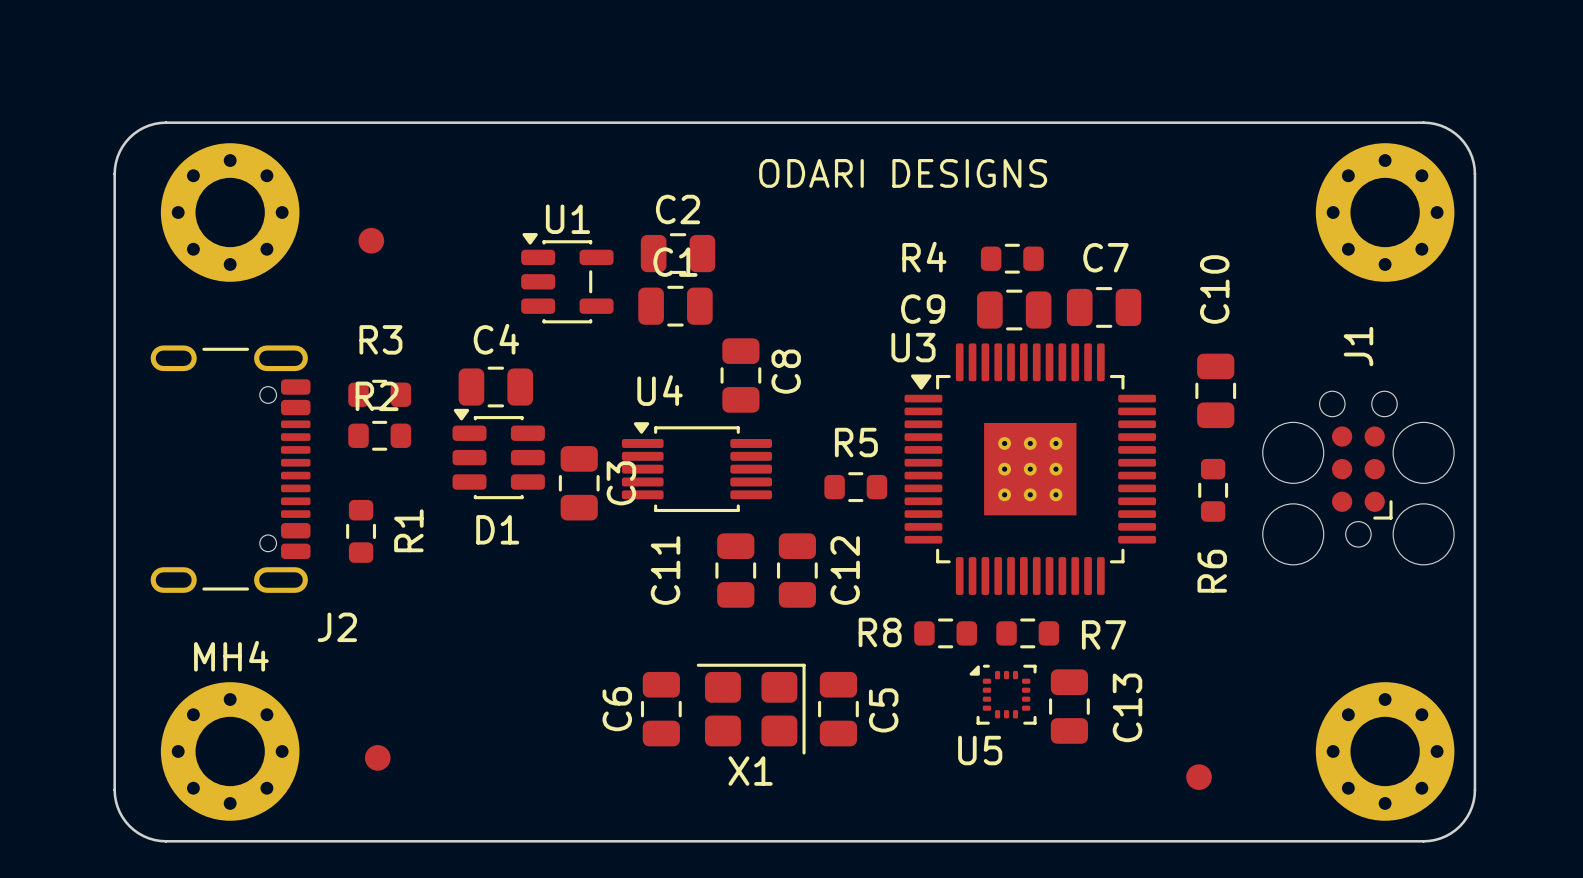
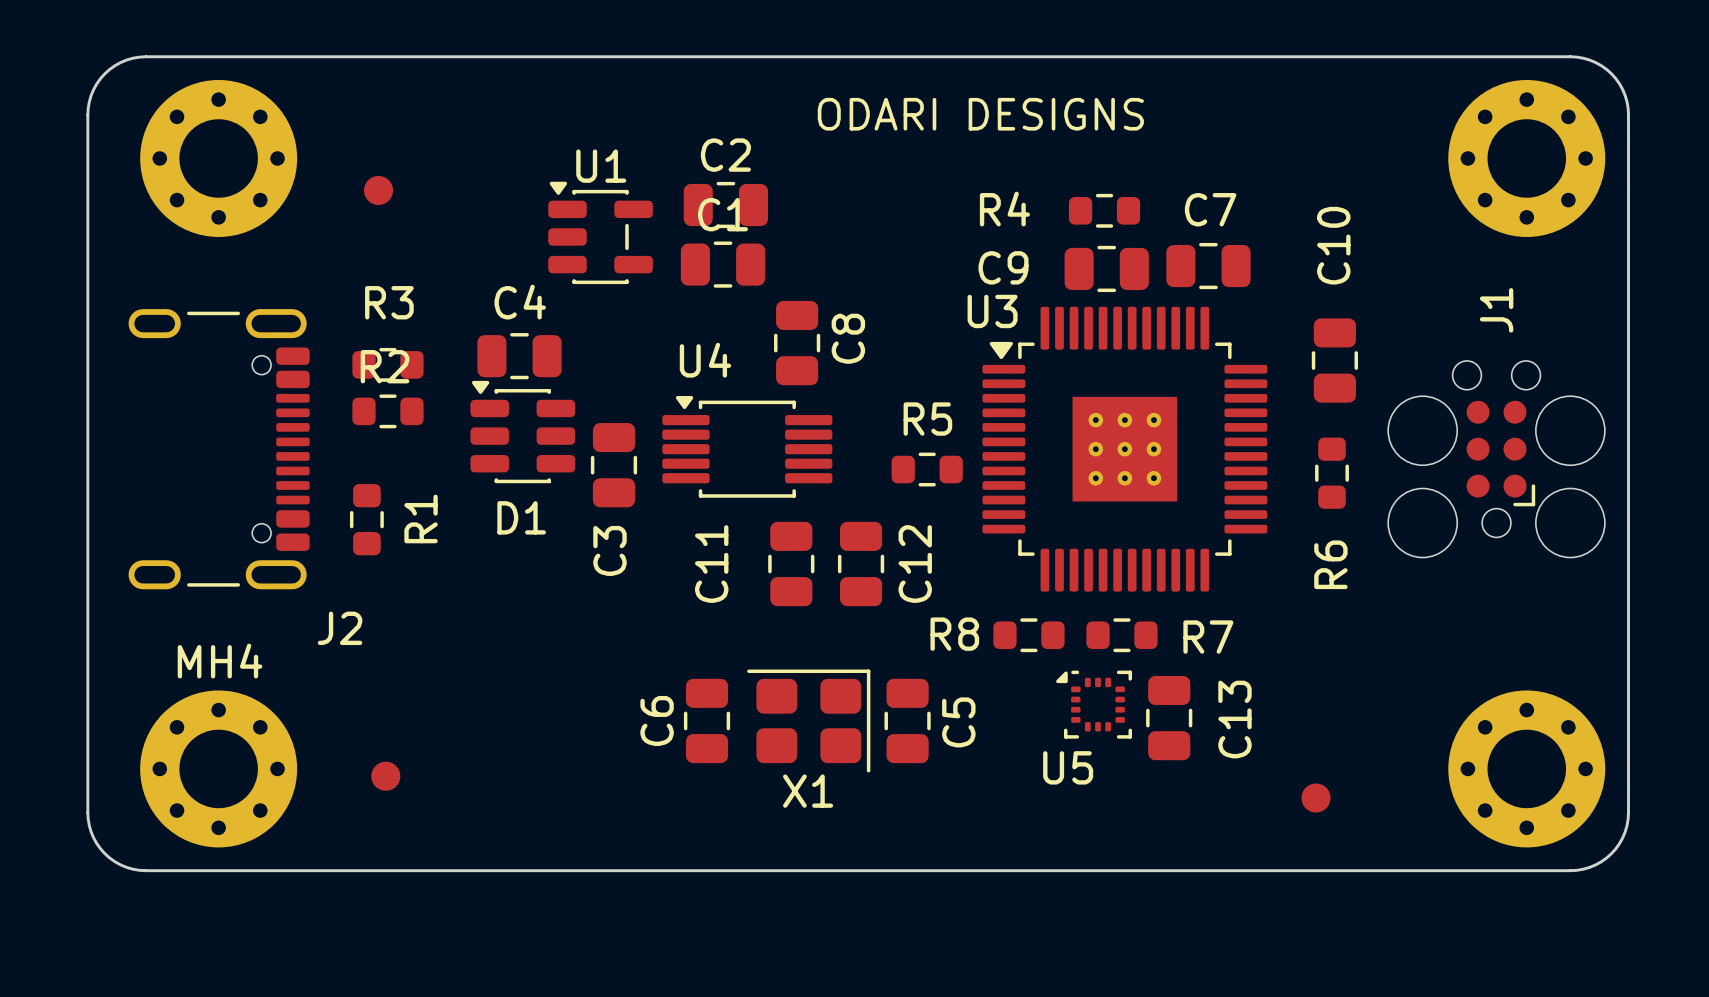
C3 name position: C3 (621, 483) -> C3 (609, 550)

